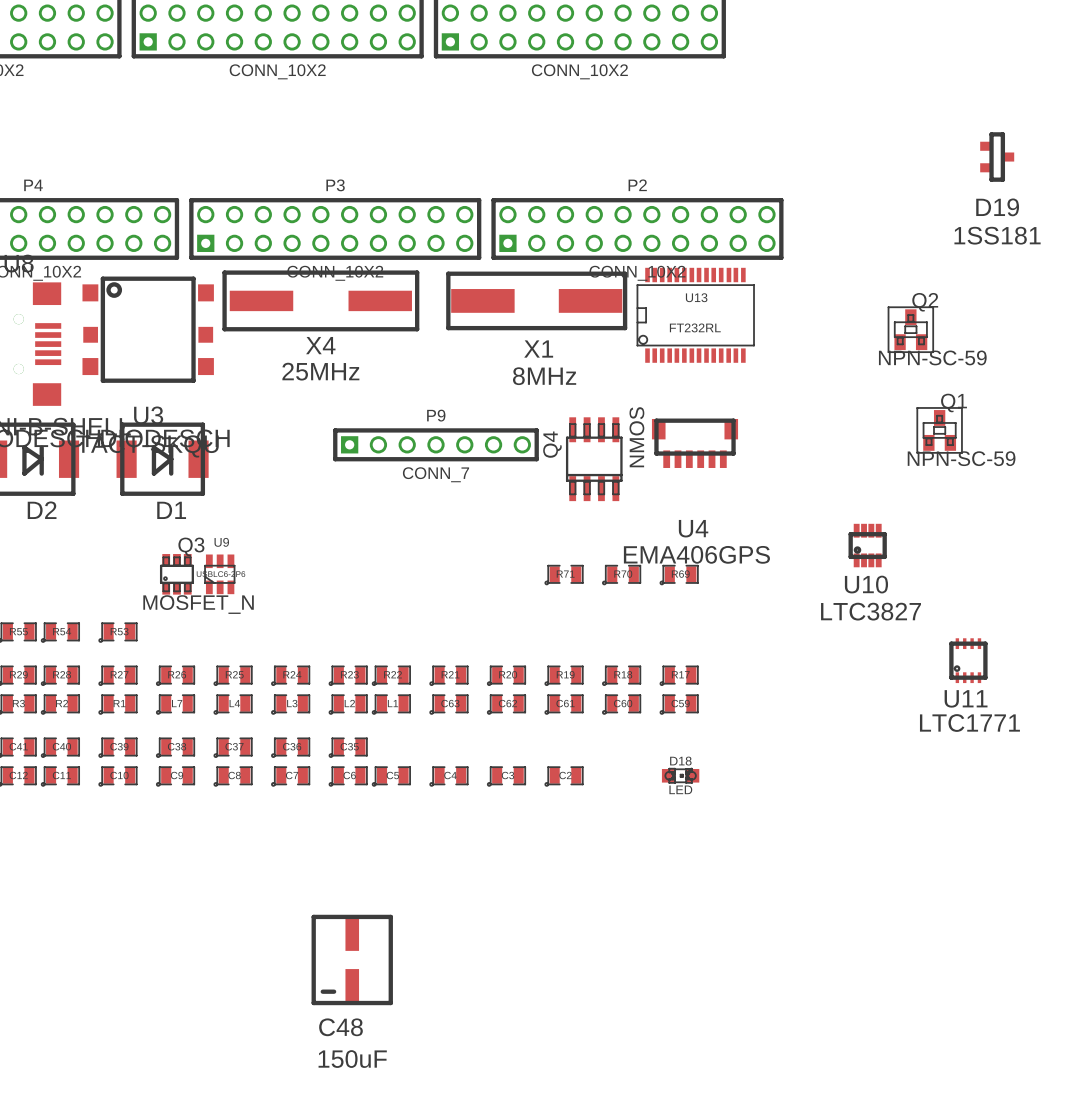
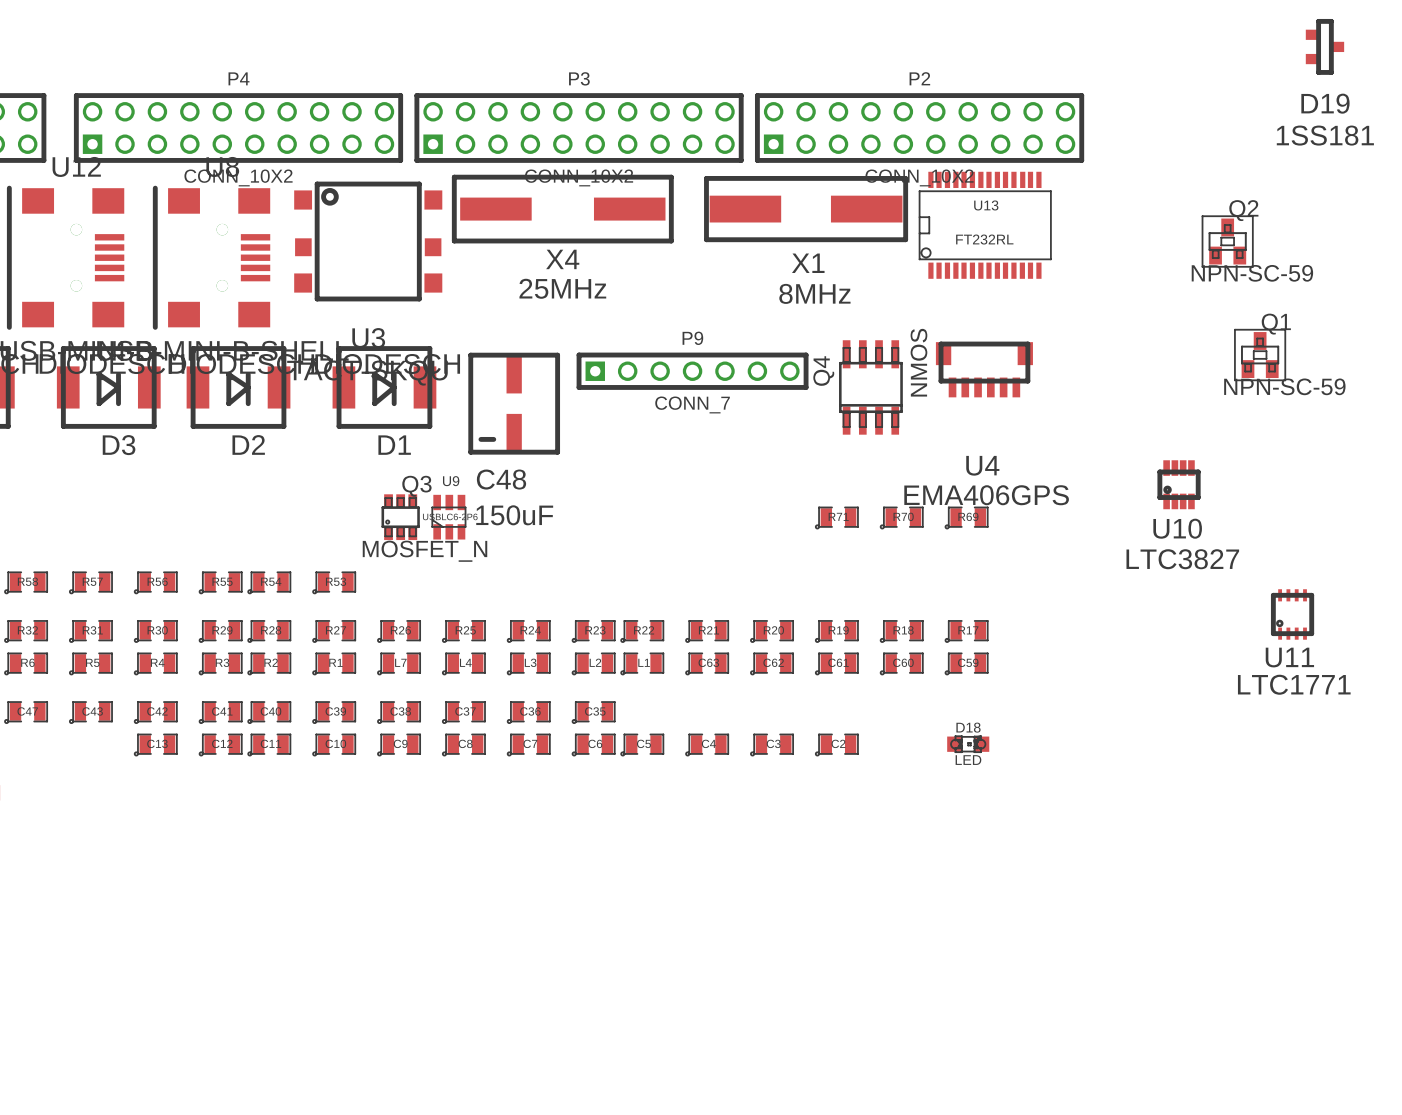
C48 position: (352, 959) -> (514, 403)

